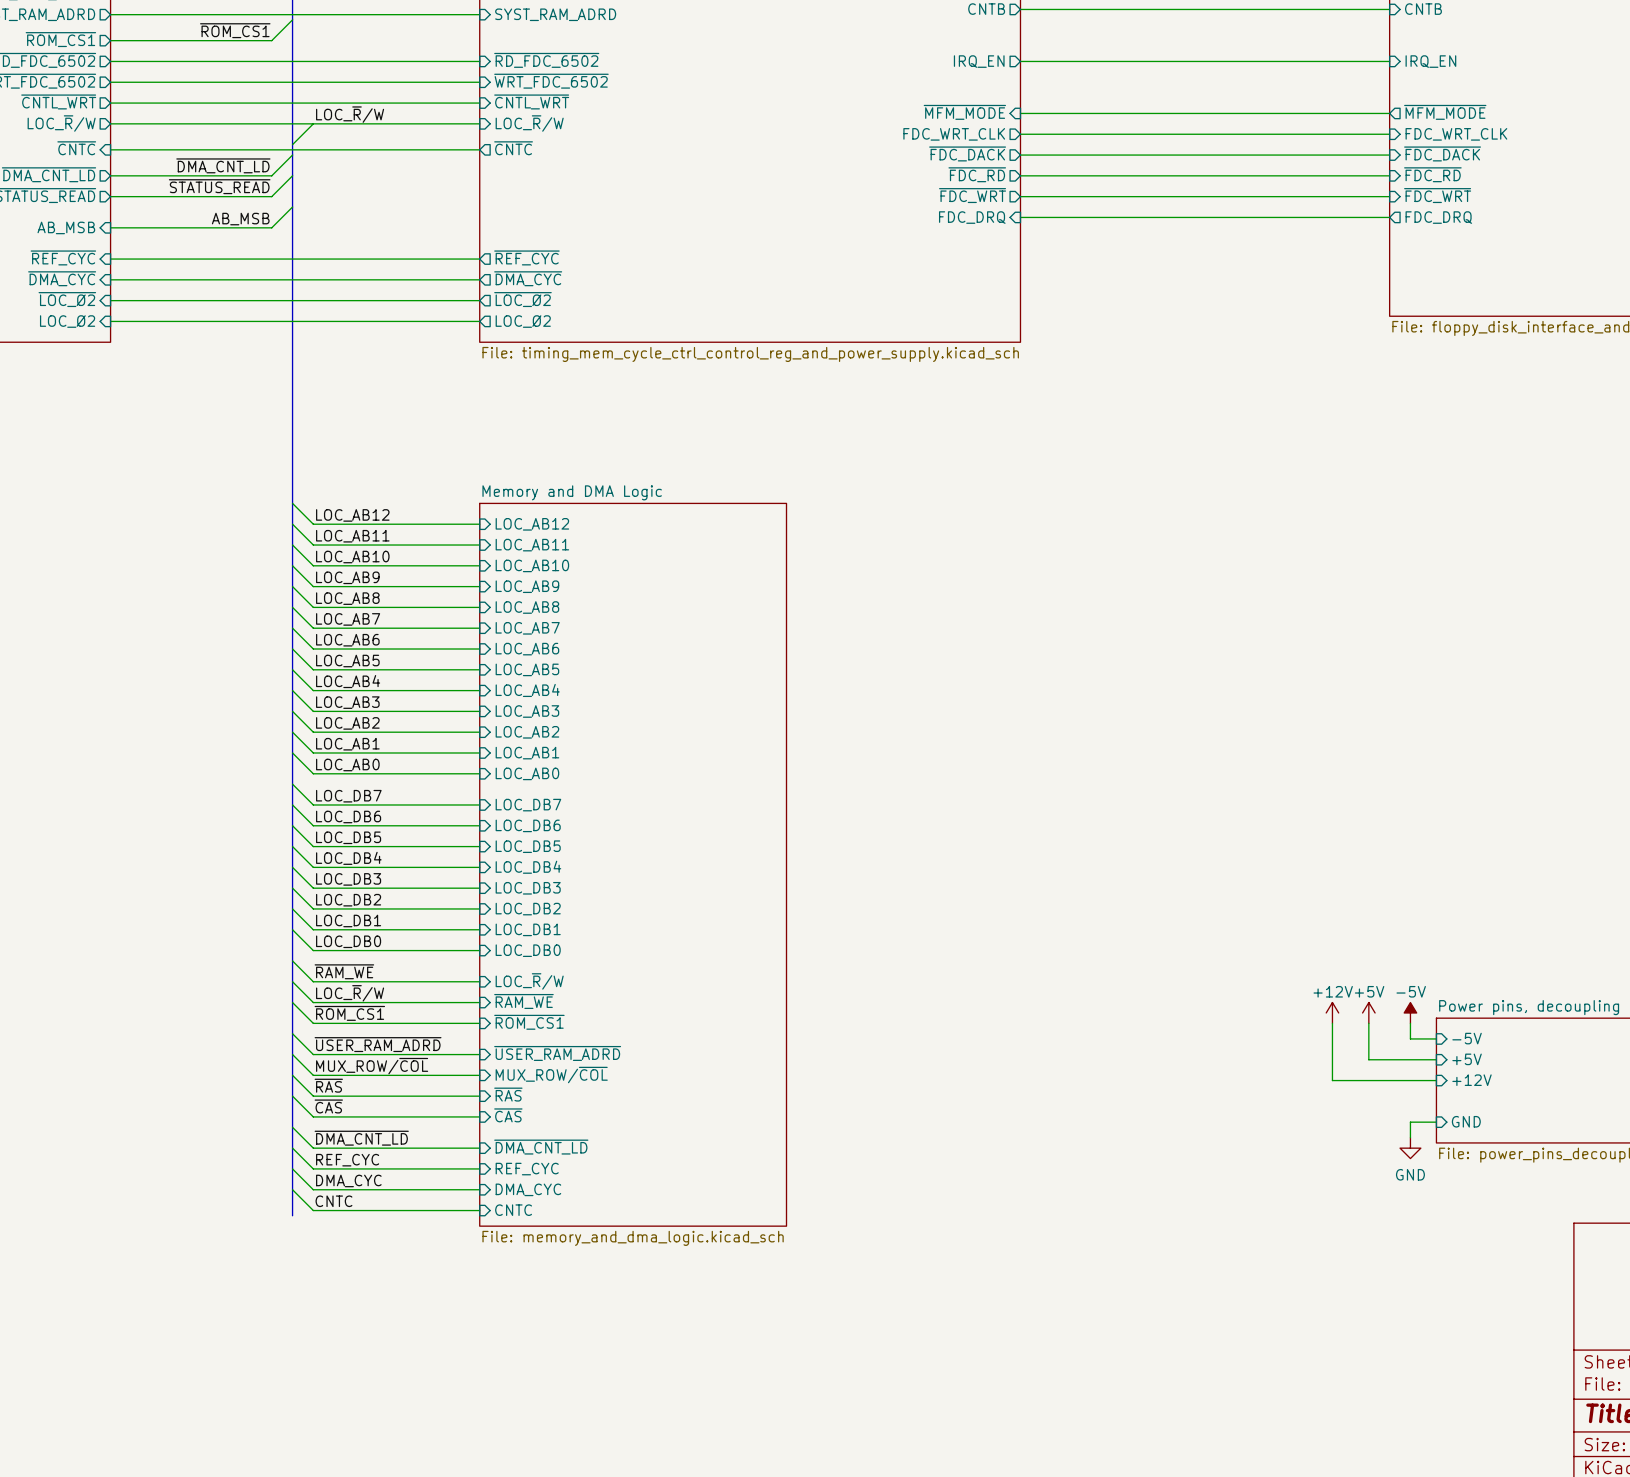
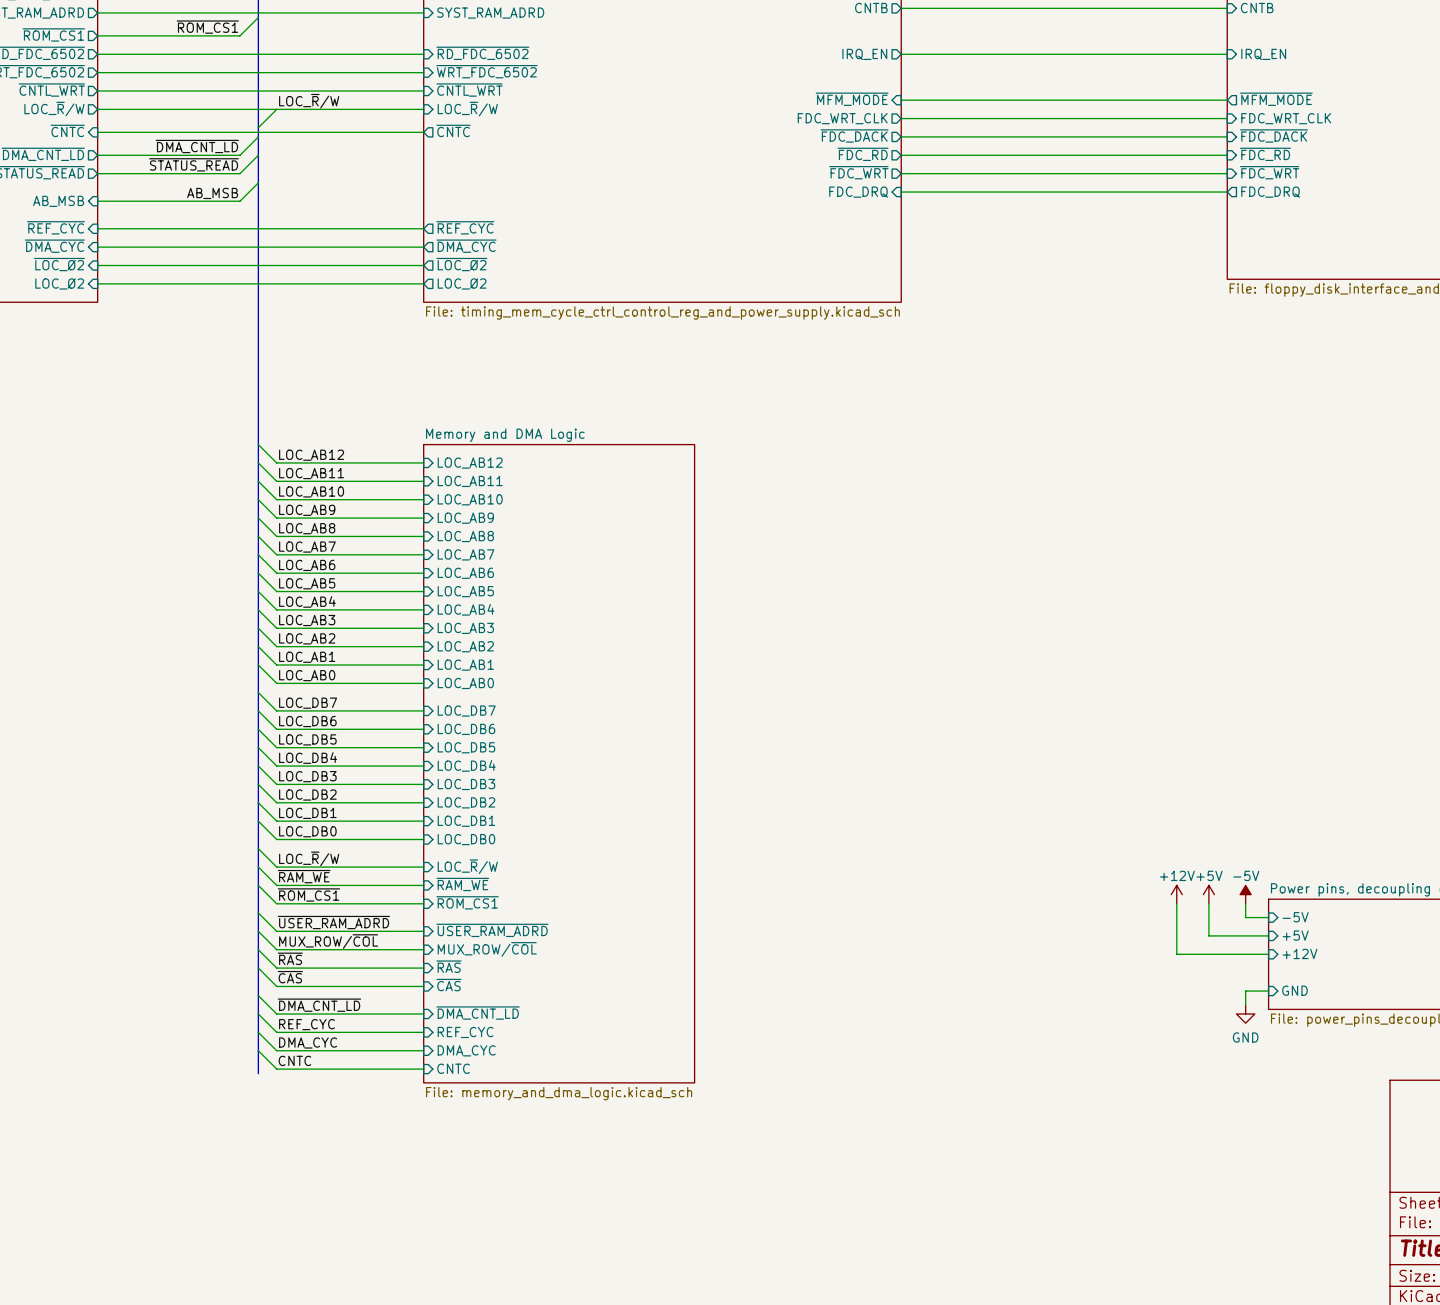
label: ~{RAM_WE} (344, 971) -> LOC_~{R}/W (309, 858)
label: LOC_~{R}/W (350, 993) -> ~{RAM_WE} (304, 876)

